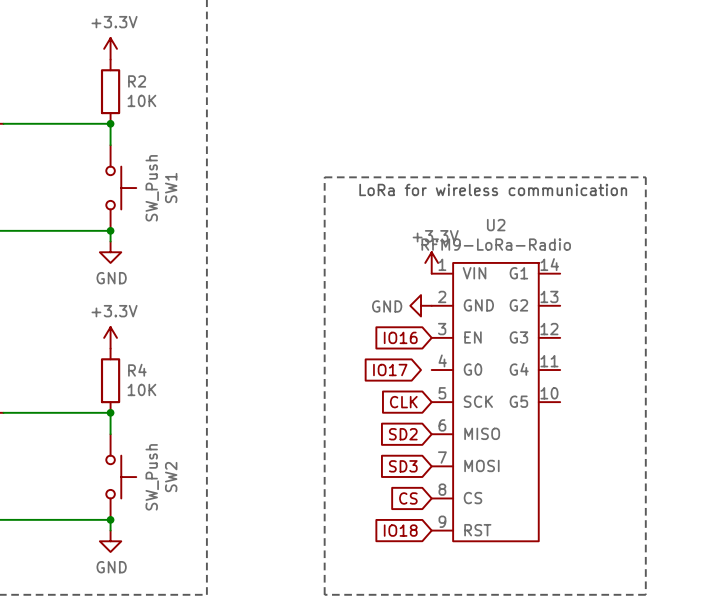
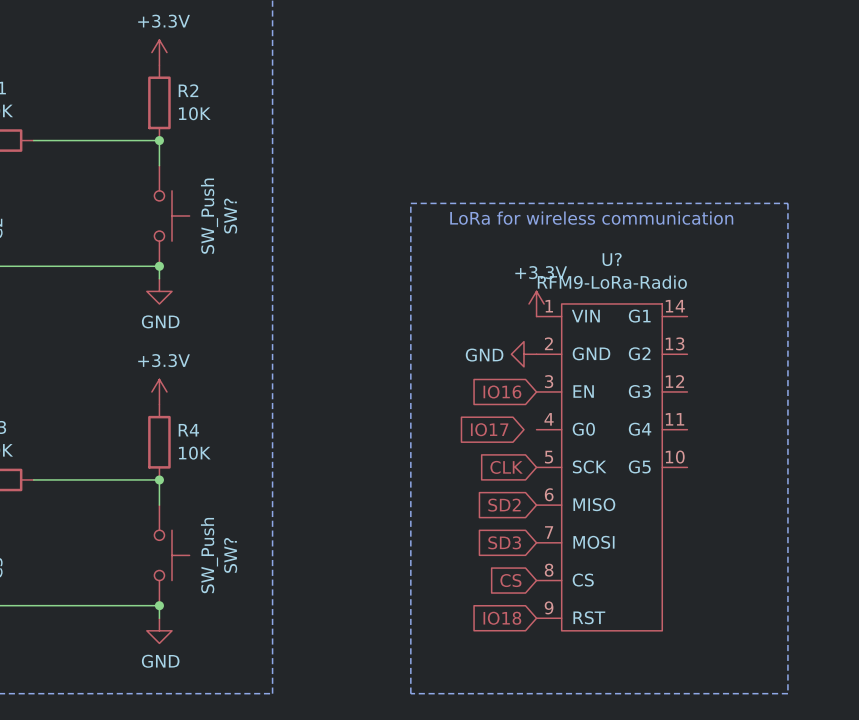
SW1 name: SW1 (171, 188) -> SW? (230, 216)
U2 name: U2 (496, 225) -> U? (612, 259)
SW2 name: SW2 (171, 477) -> SW? (230, 555)

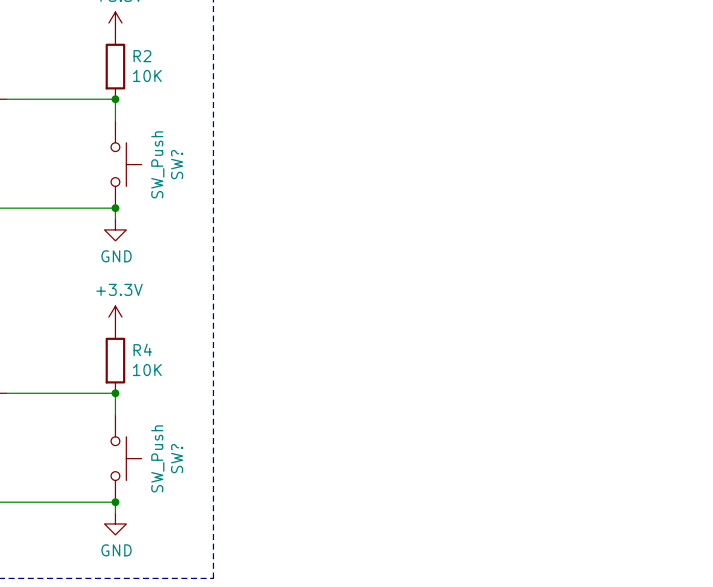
line: (410, 203) (787, 203) (787, 693) (410, 693) (410, 203) -> none
text: LoRa for wireless communication (591, 218) -> none
power symbol: +3.3V (536, 303) -> none
power symbol: GND (523, 354) -> none
global label: IO16 (502, 391) -> none
global label: IO17 (489, 429) -> none
global label: CLK (506, 467) -> none
U?: RFM9-LoRa-Radio (611, 467) -> none
global label: SD2 (504, 505) -> none
global label: SD3 (504, 542) -> none
global label: CS (510, 580) -> none
global label: IO18 (502, 618) -> none

